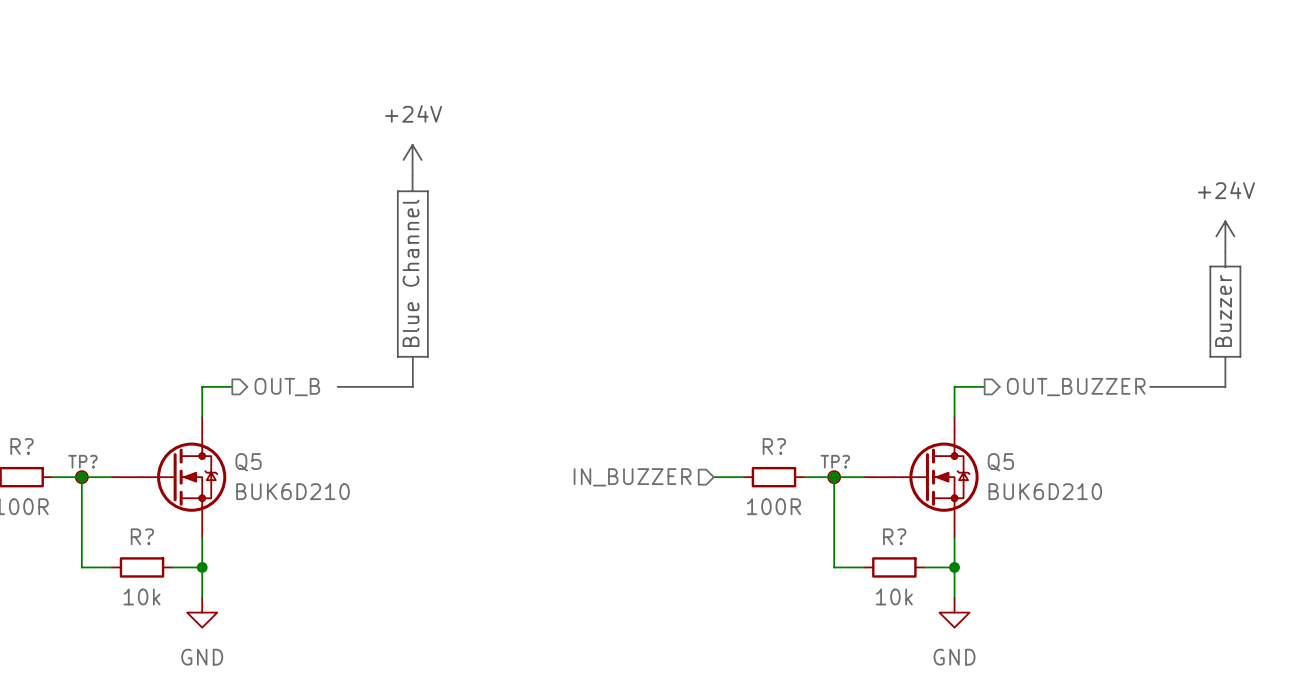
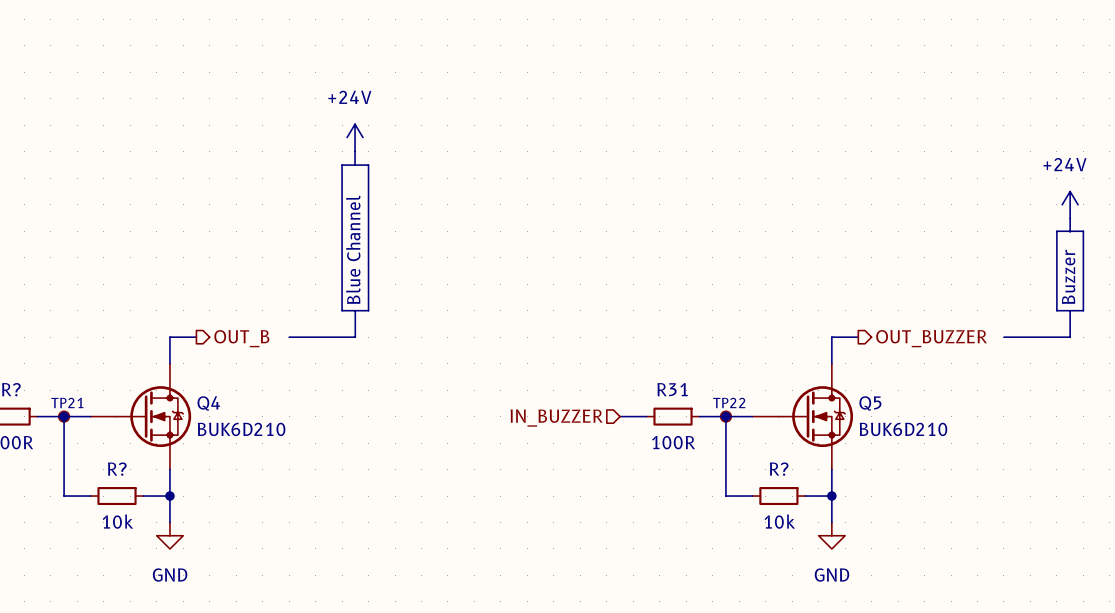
R? name: R? (774, 446) -> R31 (672, 389)
TP? name: TP? (82, 461) -> TP21 (67, 402)
TP? name: TP? (835, 461) -> TP22 (729, 402)
Q5 name: Q5 (248, 462) -> Q4 (208, 403)

